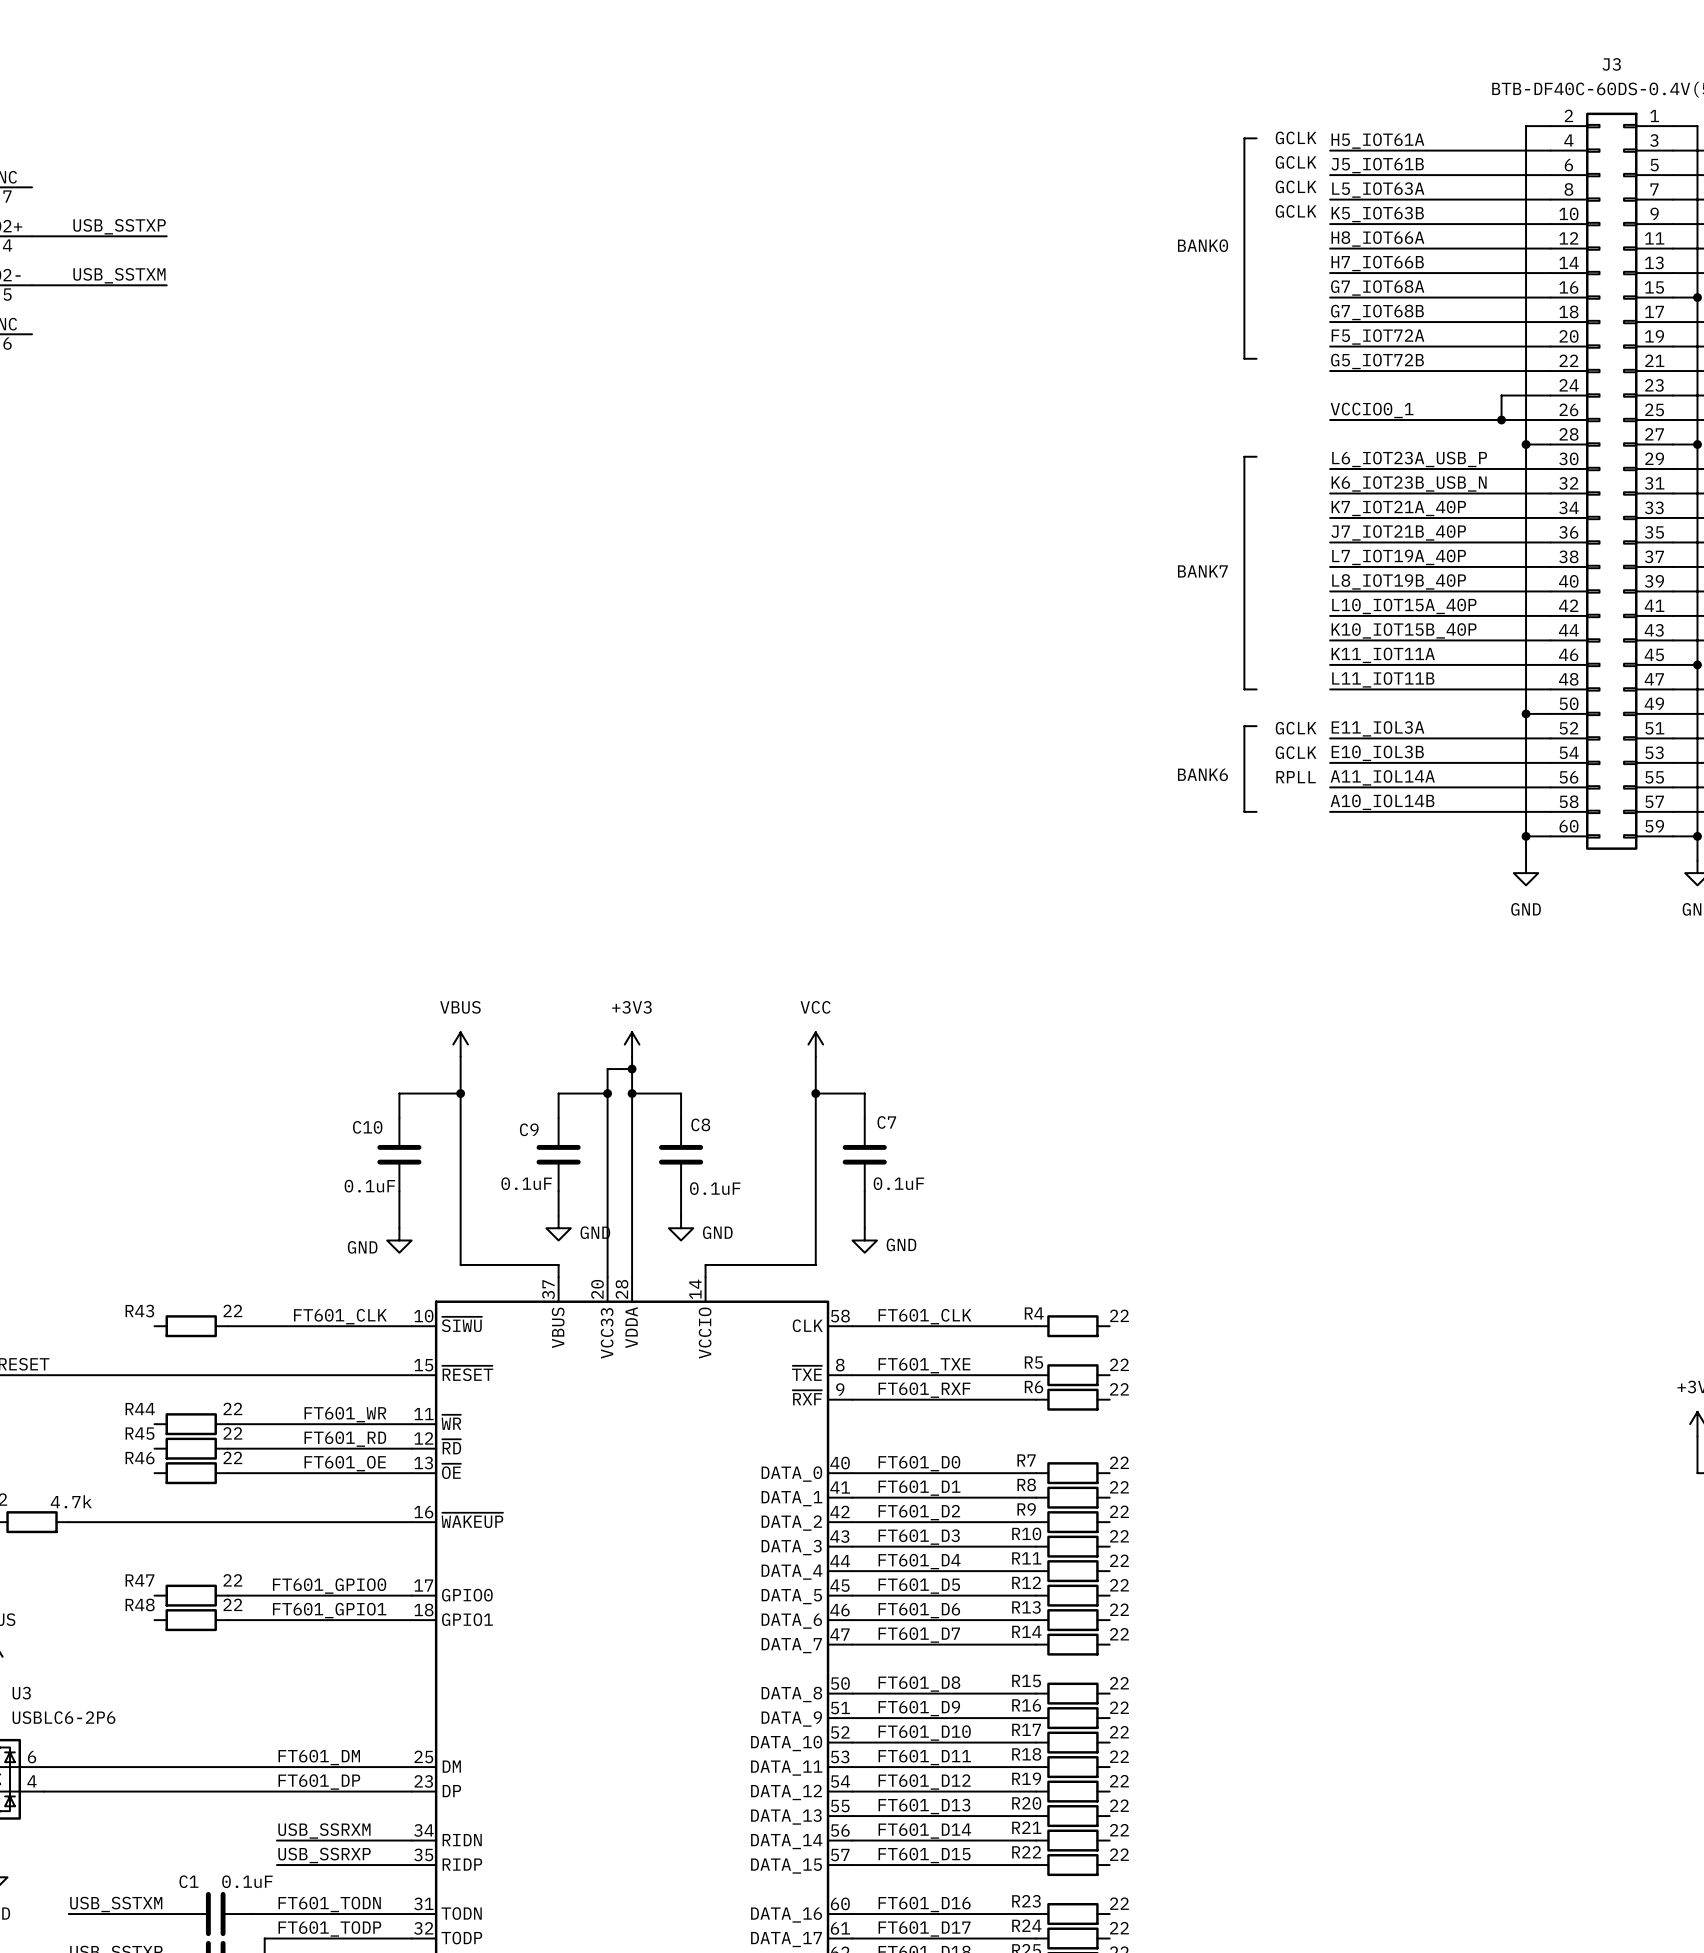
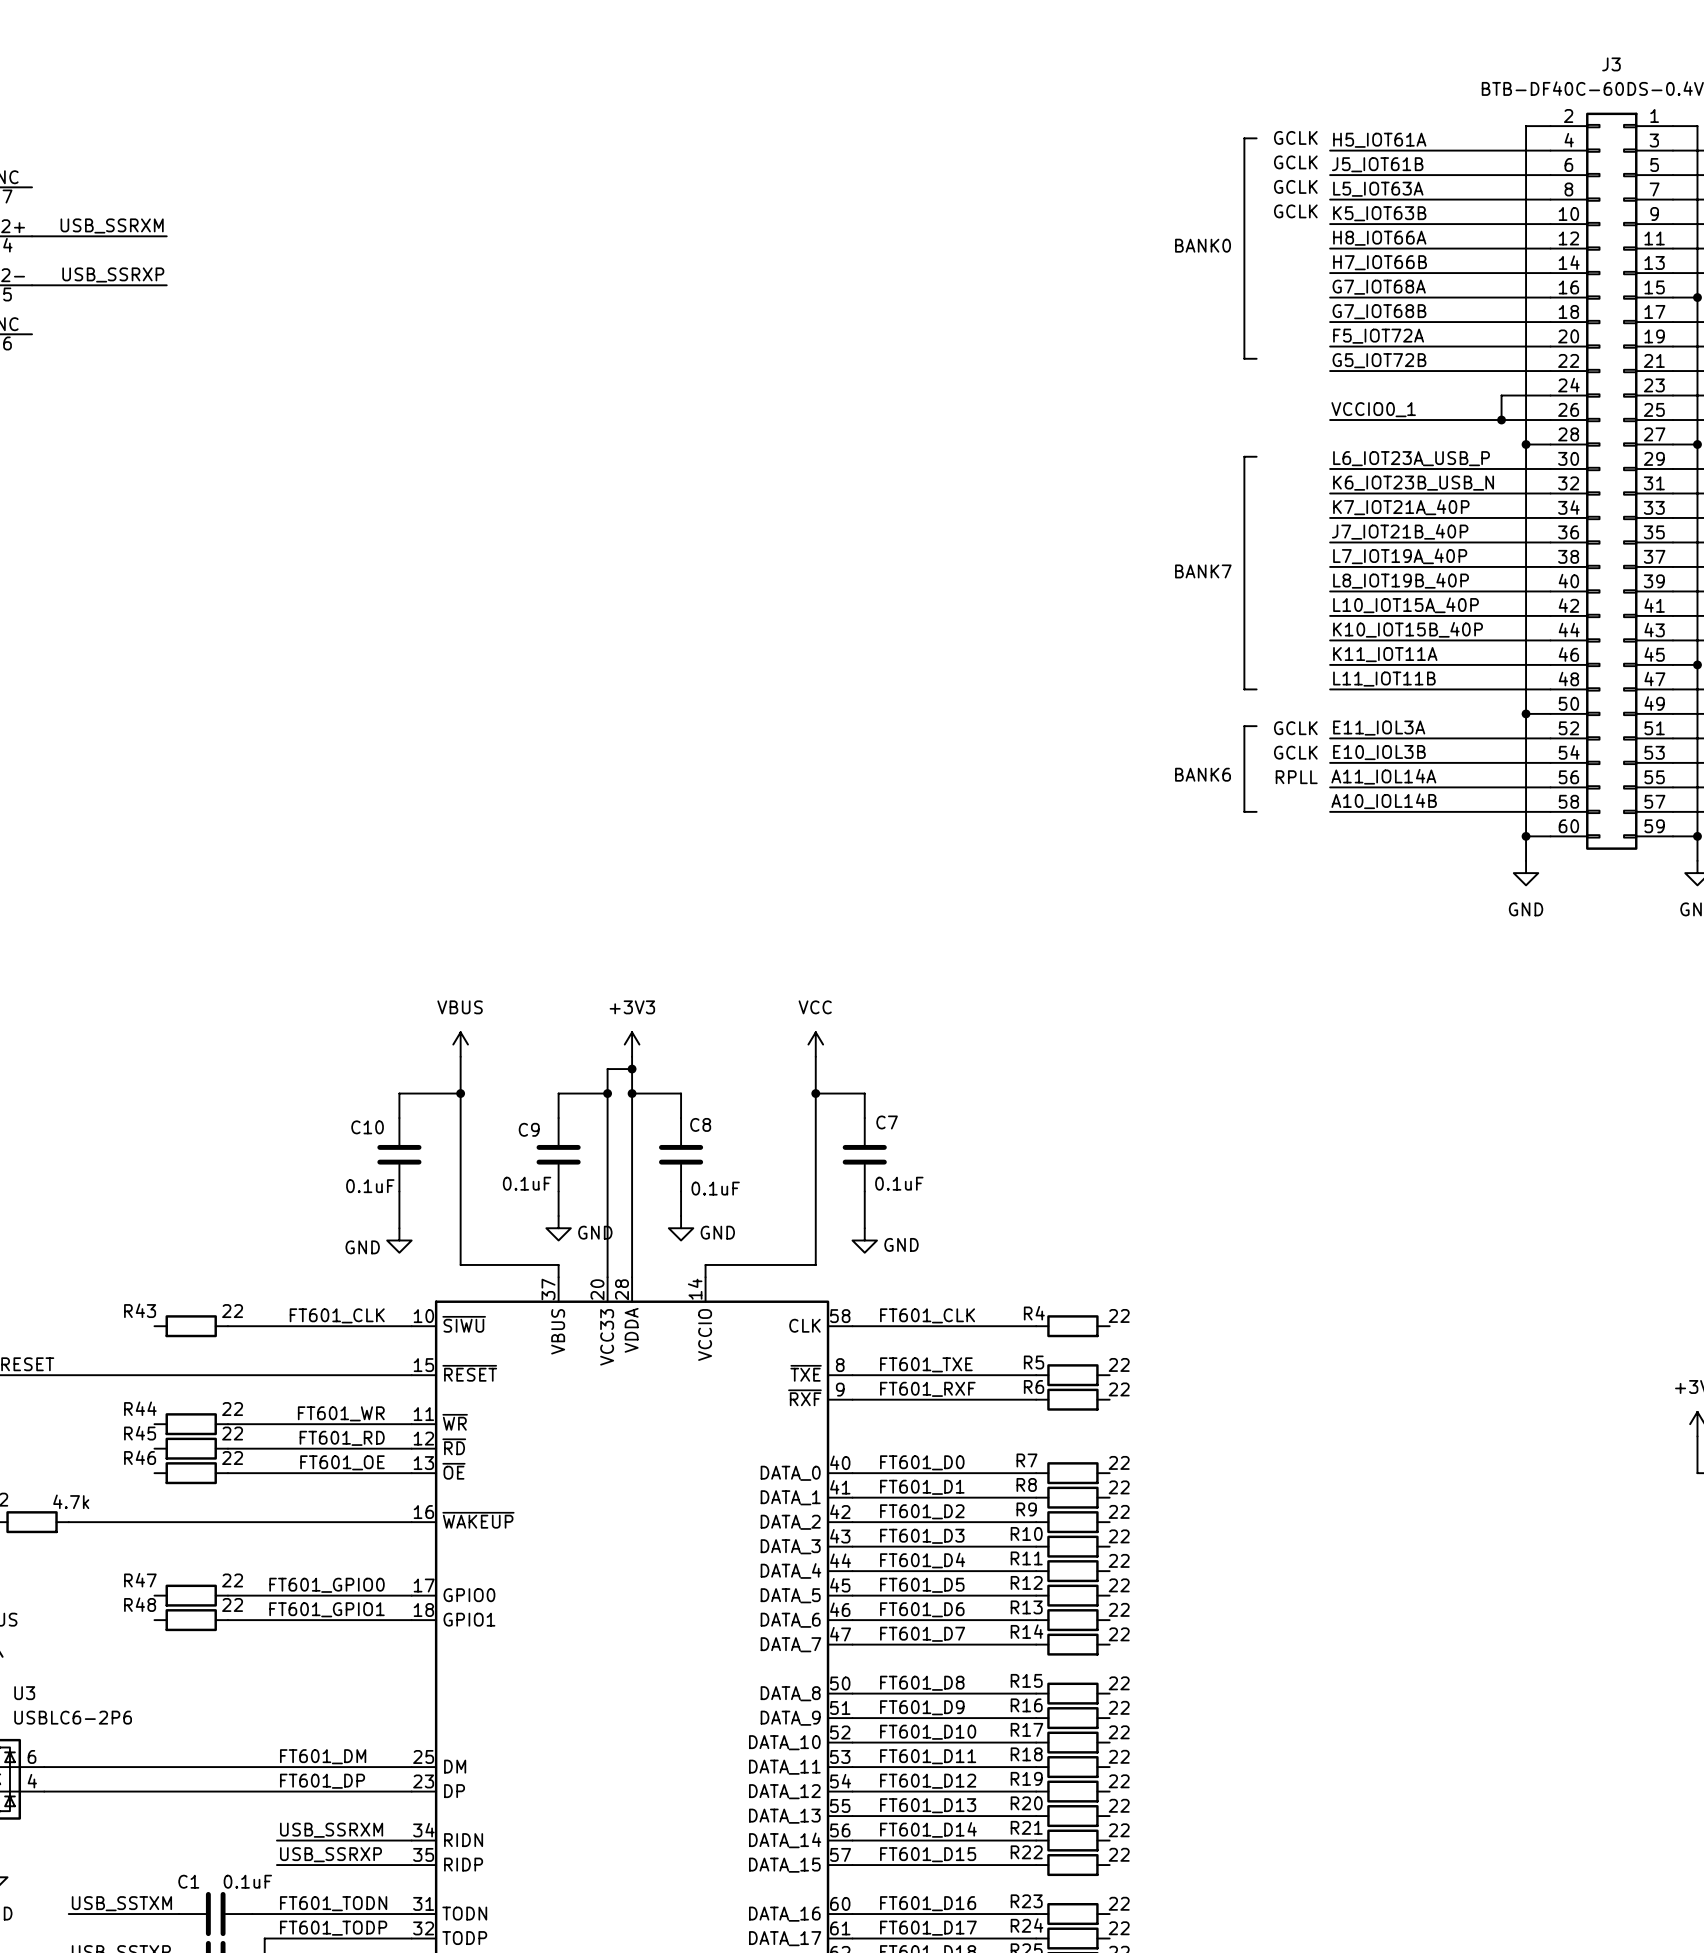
label: USB_SSTXP (119, 226) -> USB_SSRXM (112, 225)
label: USB_SSTXM (119, 275) -> USB_SSRXP (113, 274)

